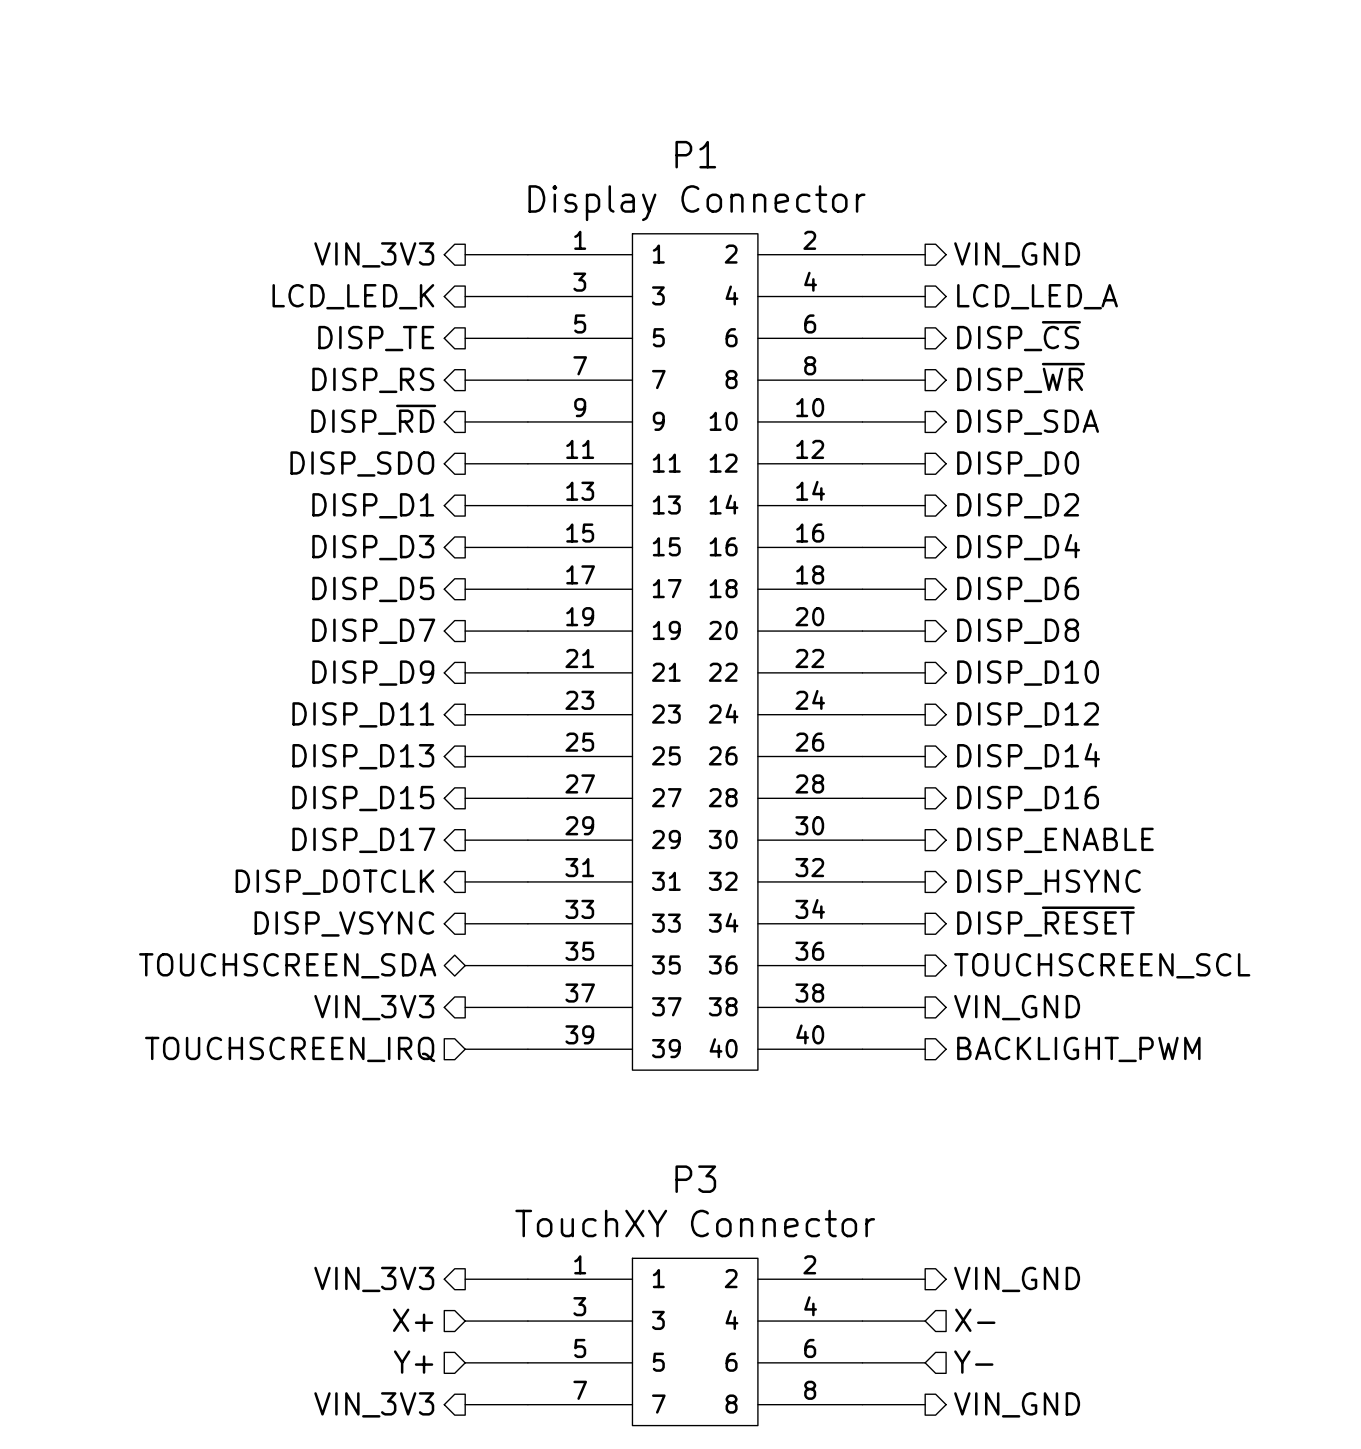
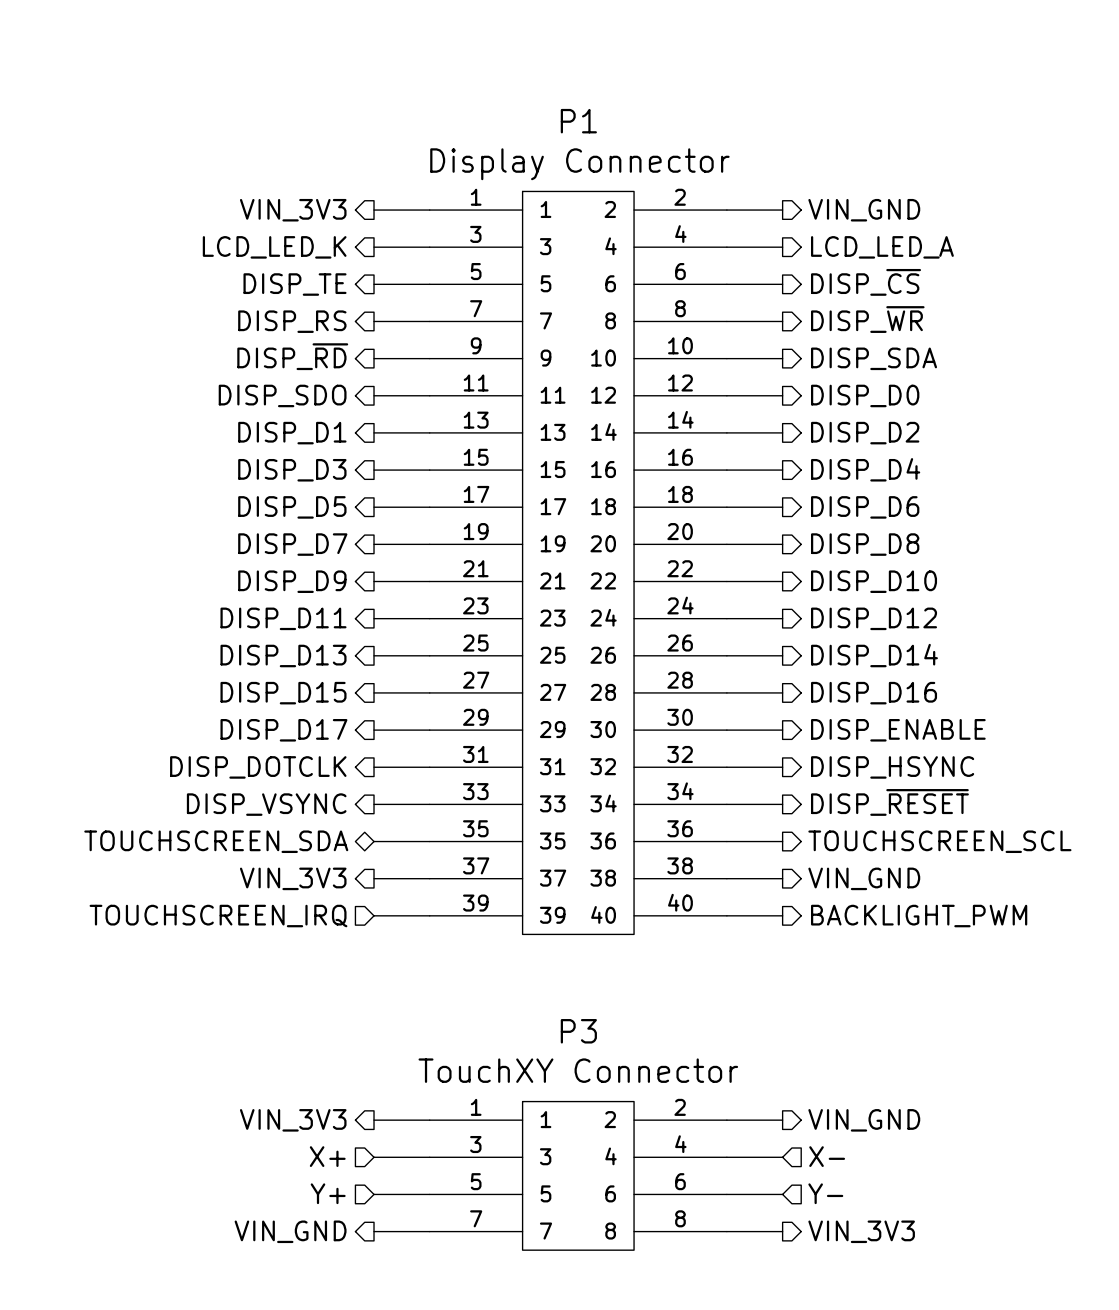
hierarchical label: VIN_3V3 (374, 1404) -> VIN_GND (290, 1231)
hierarchical label: VIN_GND (1017, 1404) -> VIN_3V3 (861, 1231)

